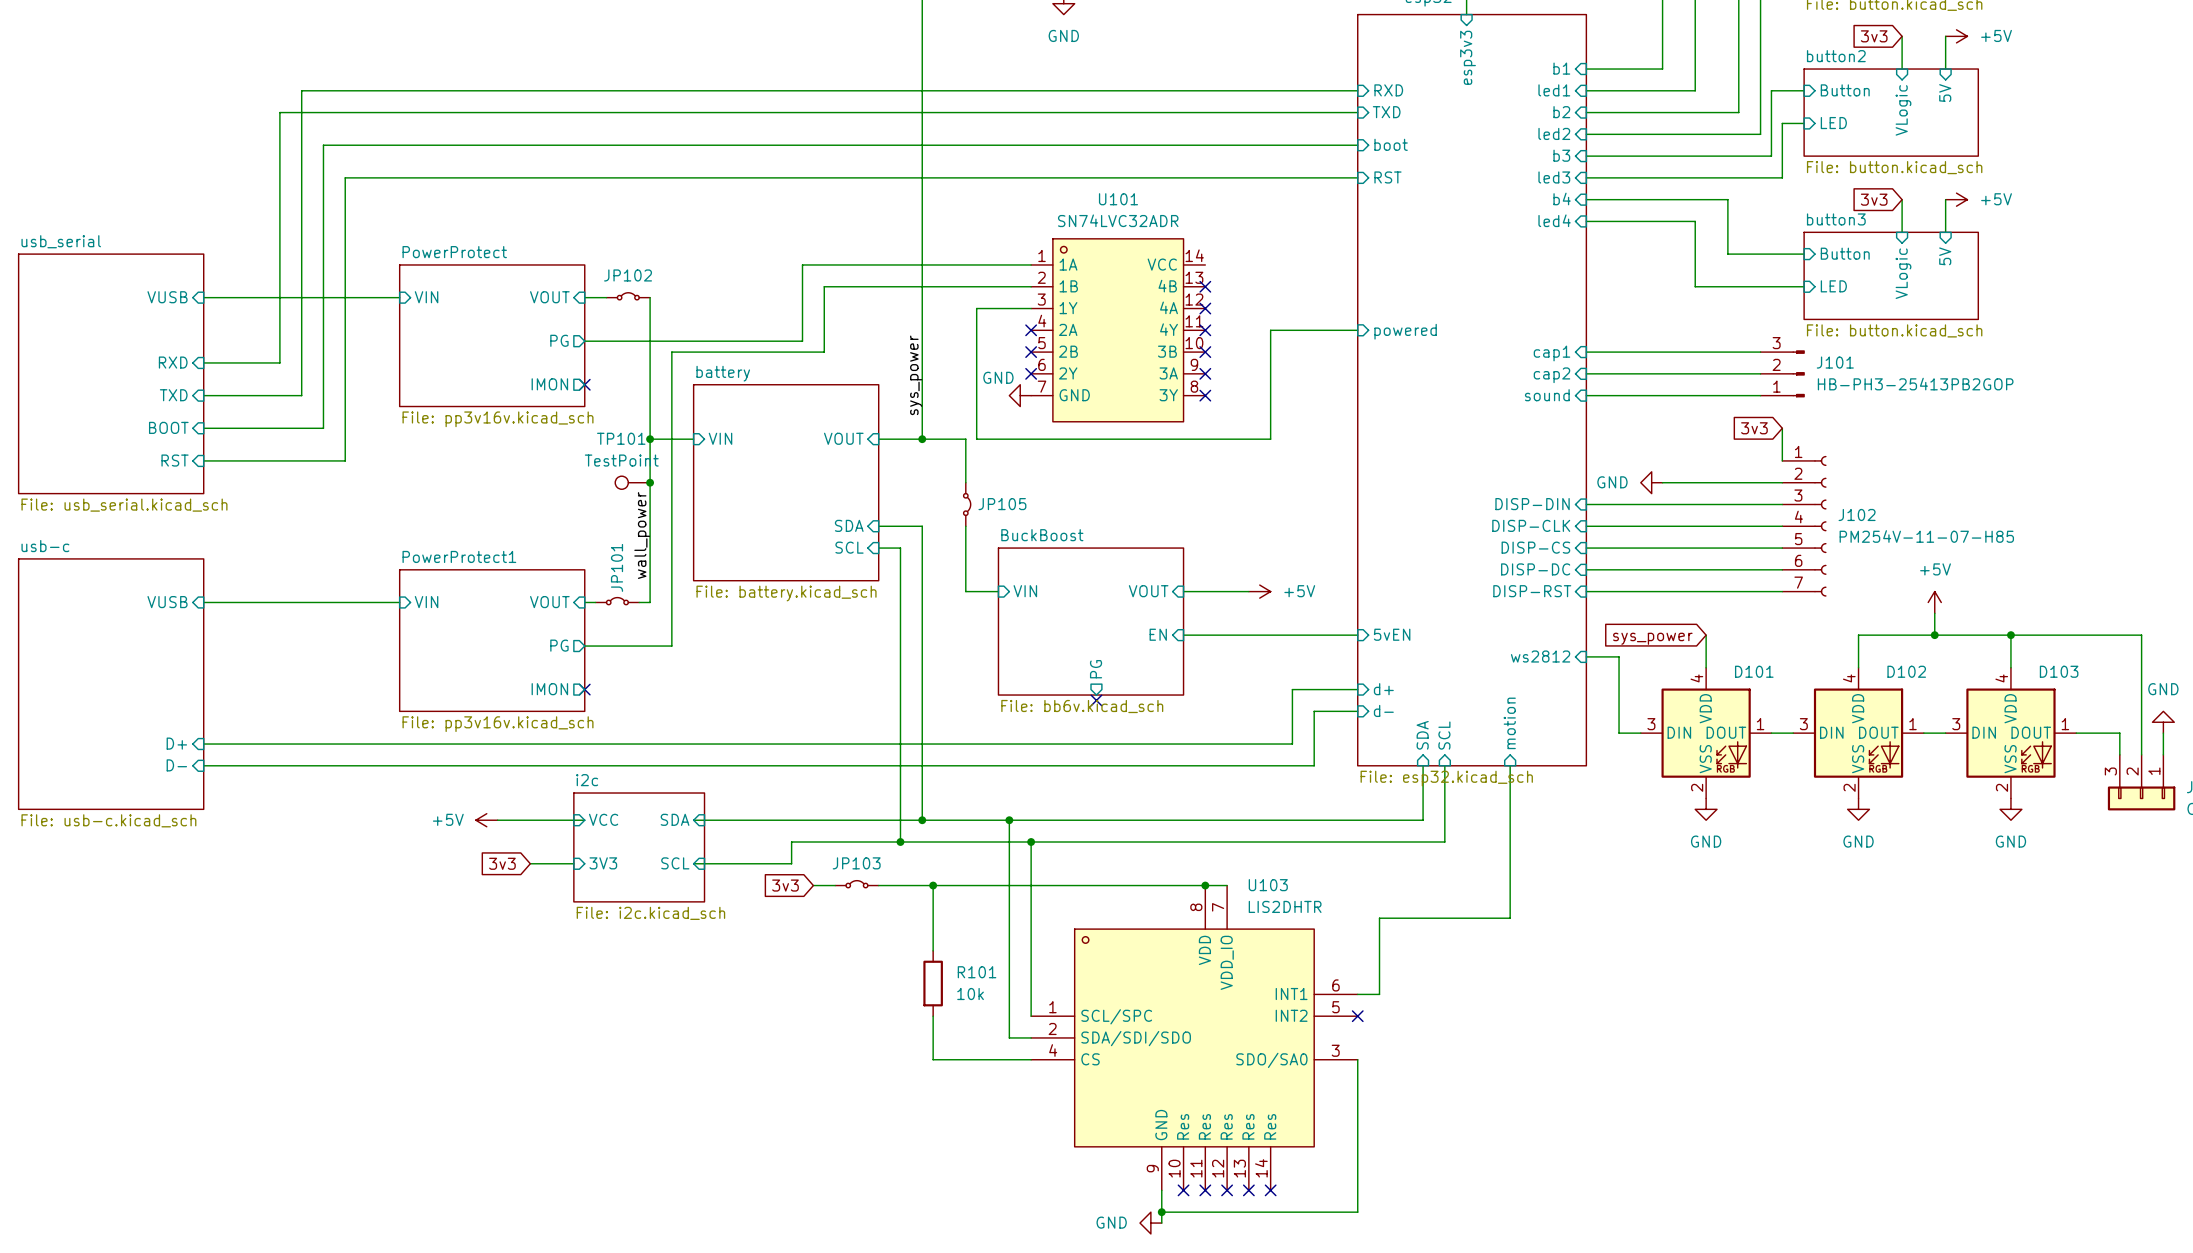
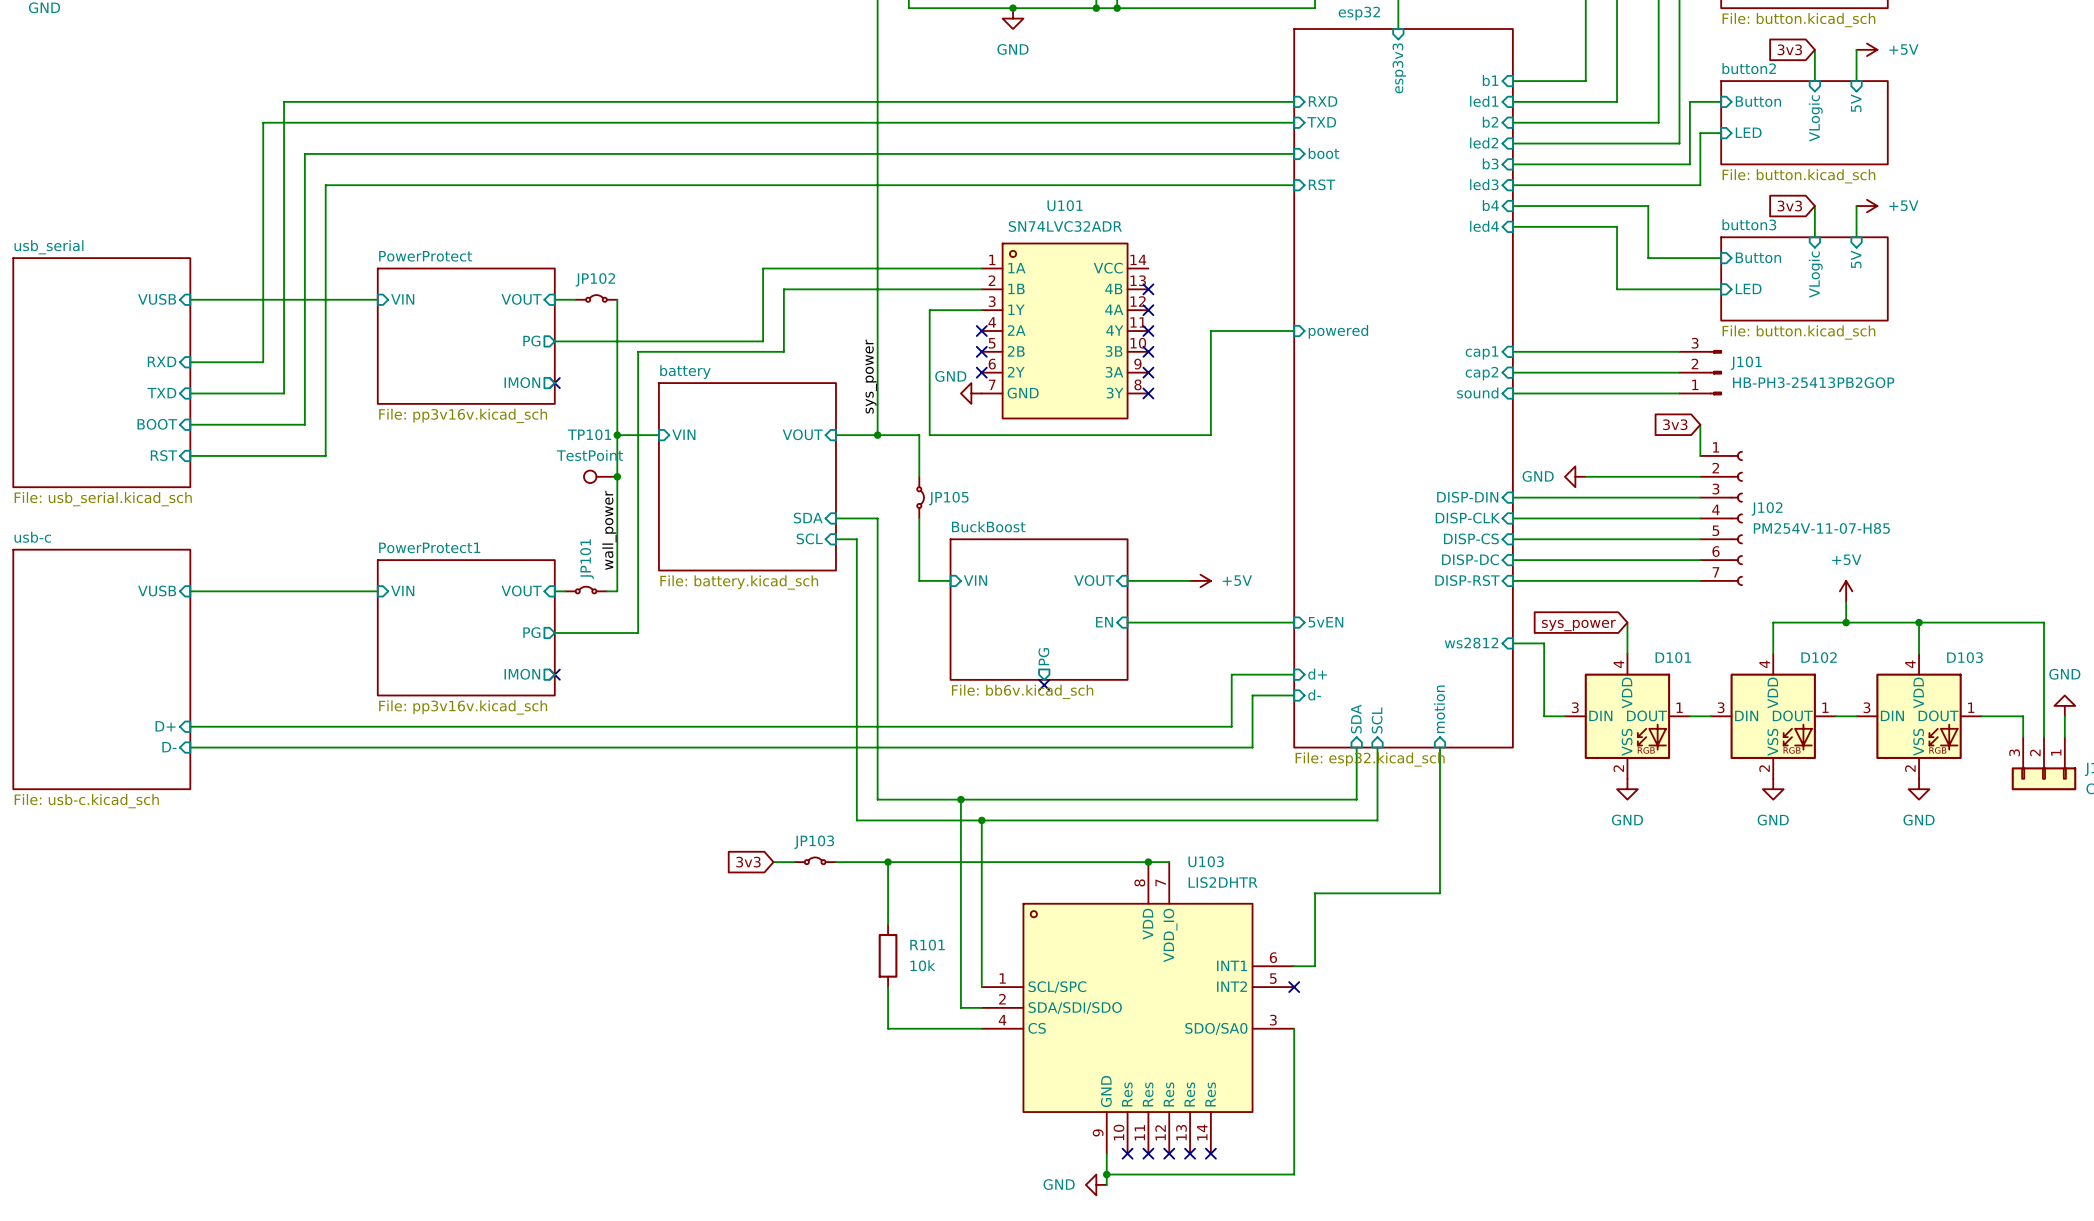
sheet pin: VCC (603, 819) -> none
sheet pin: SDA (675, 819) -> none
power symbol: +5V (486, 820) -> none
wire: (497, 820) (584, 820) -> none
wire: (693, 820) (922, 820) -> none
junction: (922, 820) -> none
wire: (900, 842) (791, 842) (791, 863) (693, 863) -> none
junction: (900, 842) -> none
sheet i2c: File: i2c.kicad_sch (639, 847) -> none
global label: 3v3 (502, 863) -> none
wire: (530, 863) (573, 863) -> none
sheet pin: 3V3 (603, 863) -> none
sheet pin: SCL (675, 863) -> none

